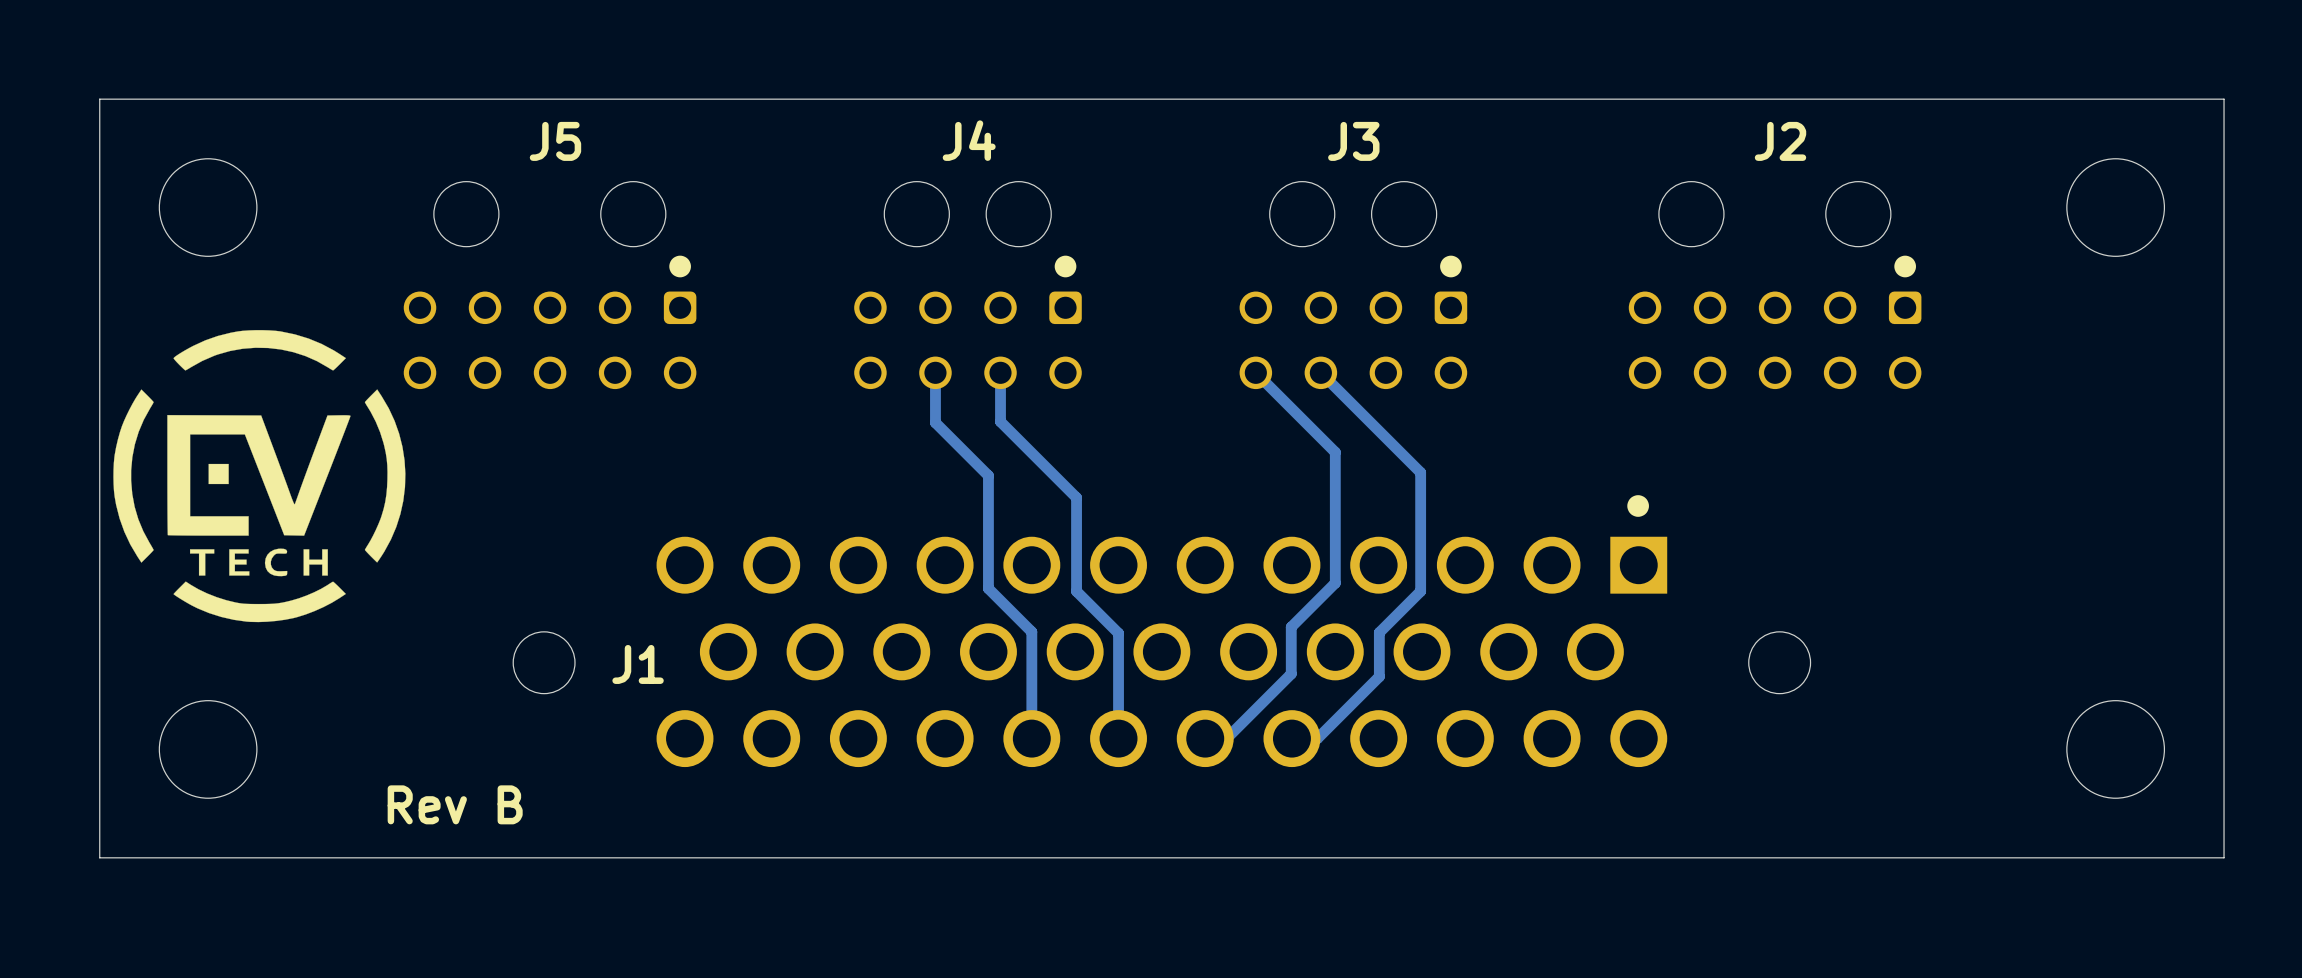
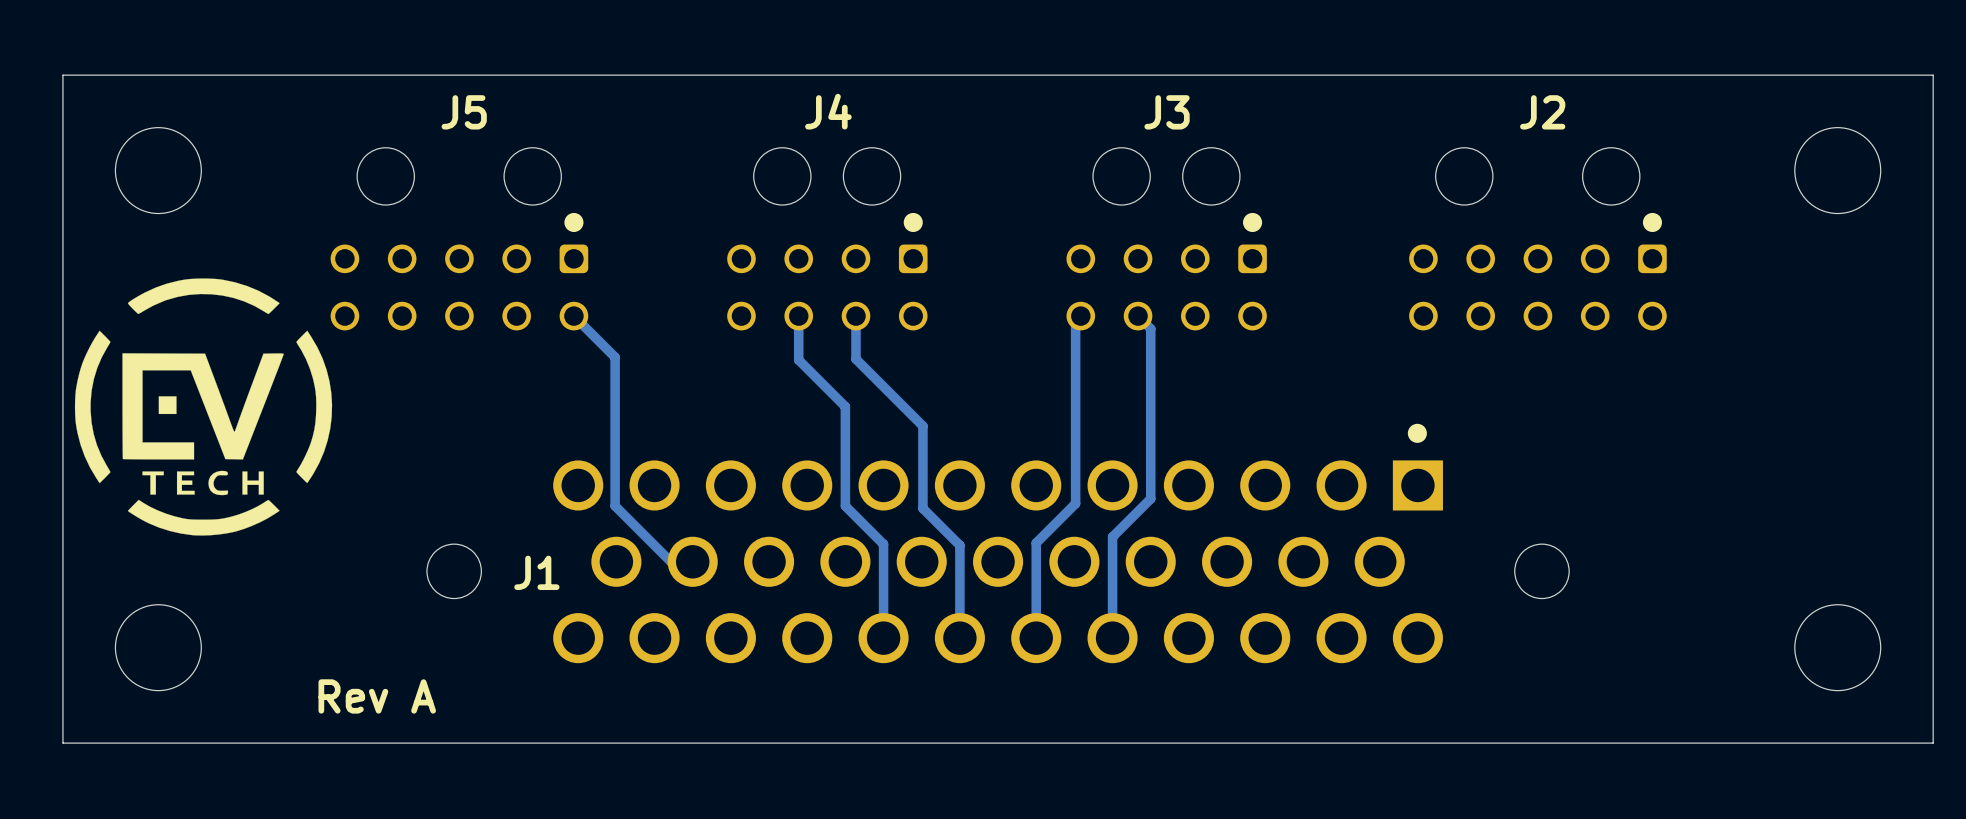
track: none -> (573, 316) (615, 357) (615, 506) (670, 561) (692, 561)
track: (1255, 372) (1335, 452) -> (1150, 328) (1150, 386)
track: none -> (1080, 316) (1075, 321) (1075, 503) (1036, 543) (1036, 638)
track: (1335, 387) (1420, 472) (1420, 591) (1379, 632) (1379, 676) (1317, 738) (1291, 738) -> none
track: (1335, 580) (1335, 583) (1291, 627) (1291, 673) (1226, 738) (1205, 738) -> (1150, 498) (1112, 536) (1112, 638)
text: Rev B (455, 804) -> Rev A (377, 696)

